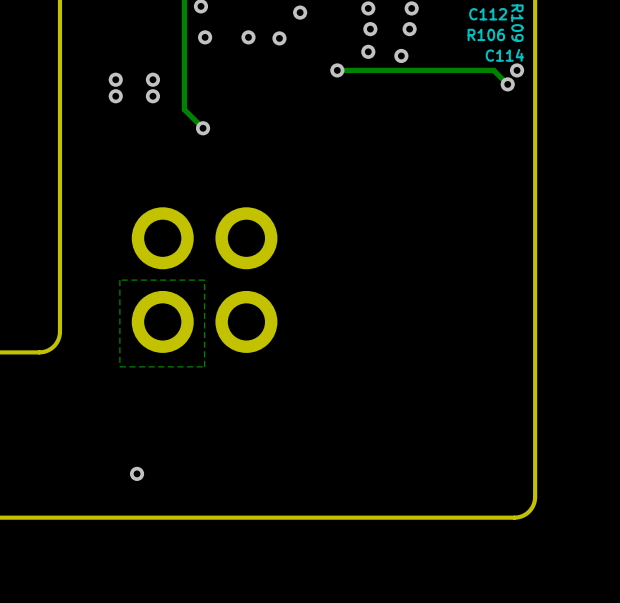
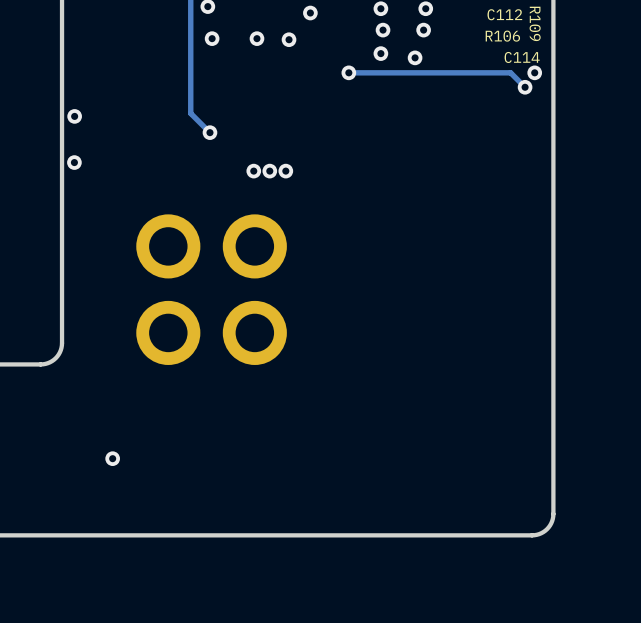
via: (115, 79) -> none
via: (152, 79) -> none
via: (115, 96) -> none
via: (152, 96) -> none
via: none -> (74, 116)
via: none -> (74, 162)
via: none -> (253, 171)
via: none -> (269, 171)
via: none -> (285, 171)
zone outline: (204, 280) (119, 280) (119, 366) (204, 366) (204, 280) -> none
via position: (137, 473) -> (112, 458)

